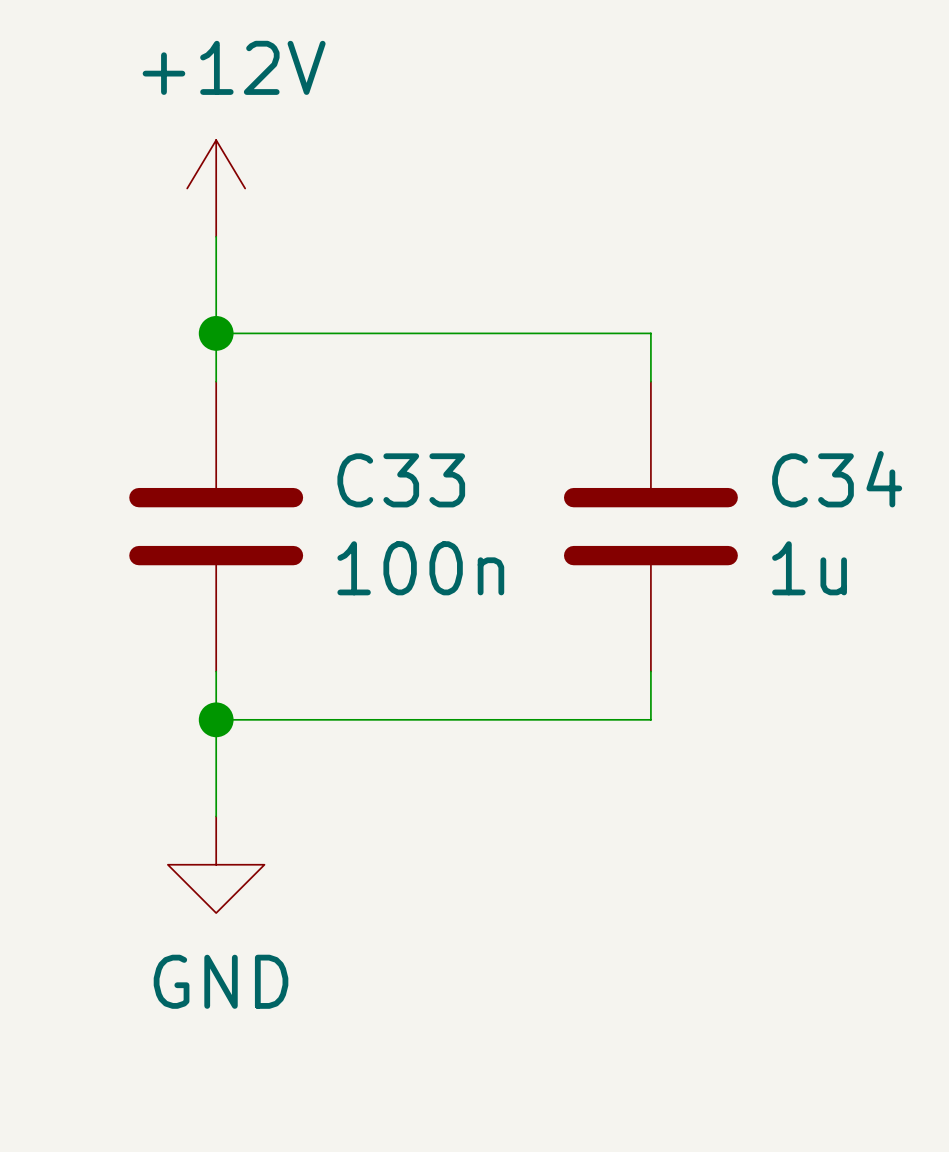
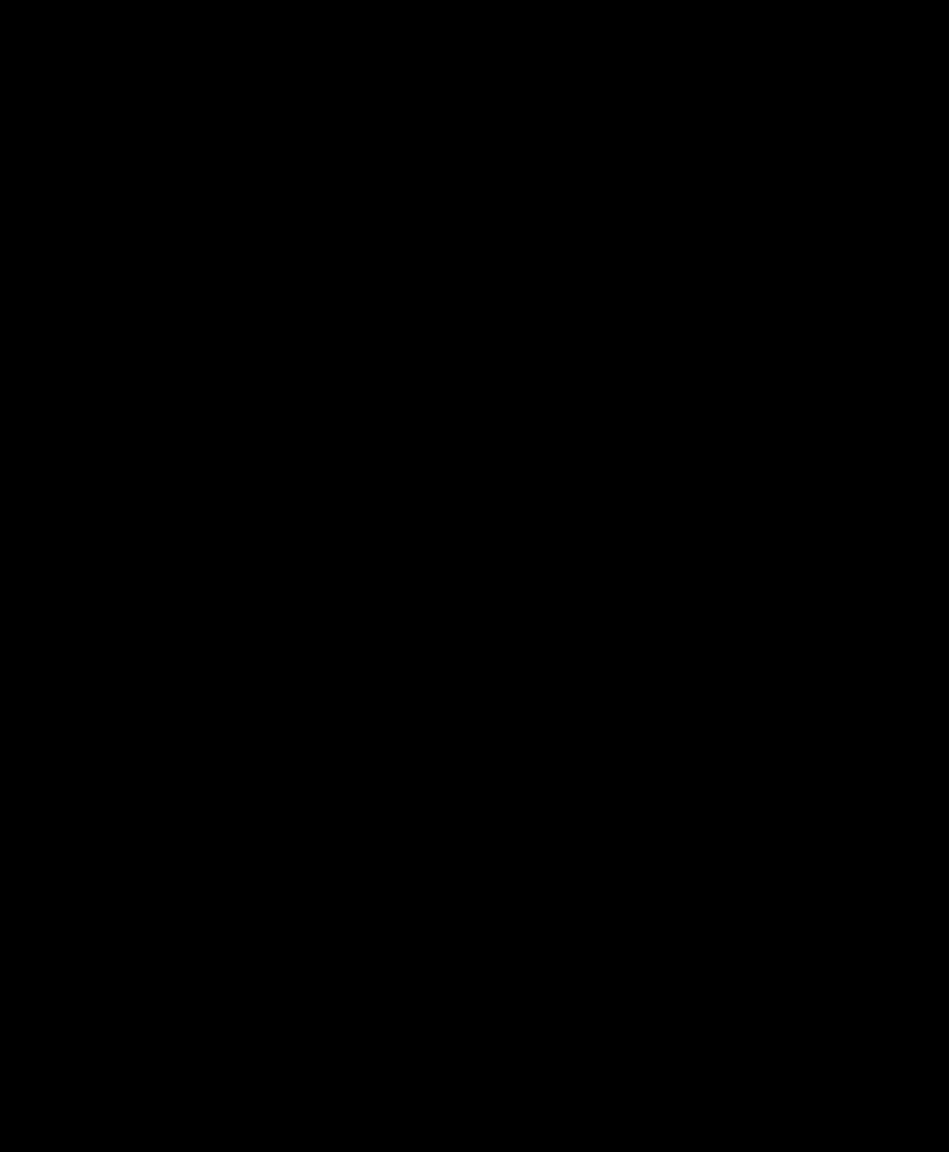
power symbol: +12V (216, 188) -> none
wire: (216, 236) (216, 381) -> none
wire: (216, 333) (650, 333) (650, 381) -> none
junction: (216, 333) -> none
C33: 100n (216, 526) -> none
C34: 1u (650, 526) -> none
wire: (216, 671) (216, 816) -> none
wire: (650, 671) (650, 719) (216, 719) -> none
junction: (216, 719) -> none
power symbol: GND (216, 864) -> none

